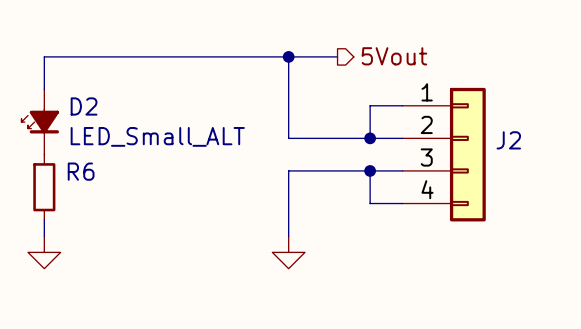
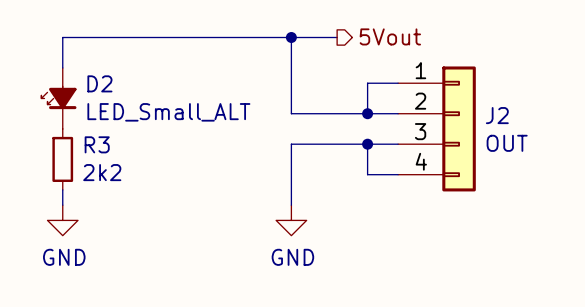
J2 value: none -> OUT (507, 143)
R6 name: R6 (81, 171) -> R3 (97, 144)
R6 value: none -> 2k2 (102, 172)
power symbol text: none -> GND (64, 257)
power symbol text: none -> GND (292, 257)

